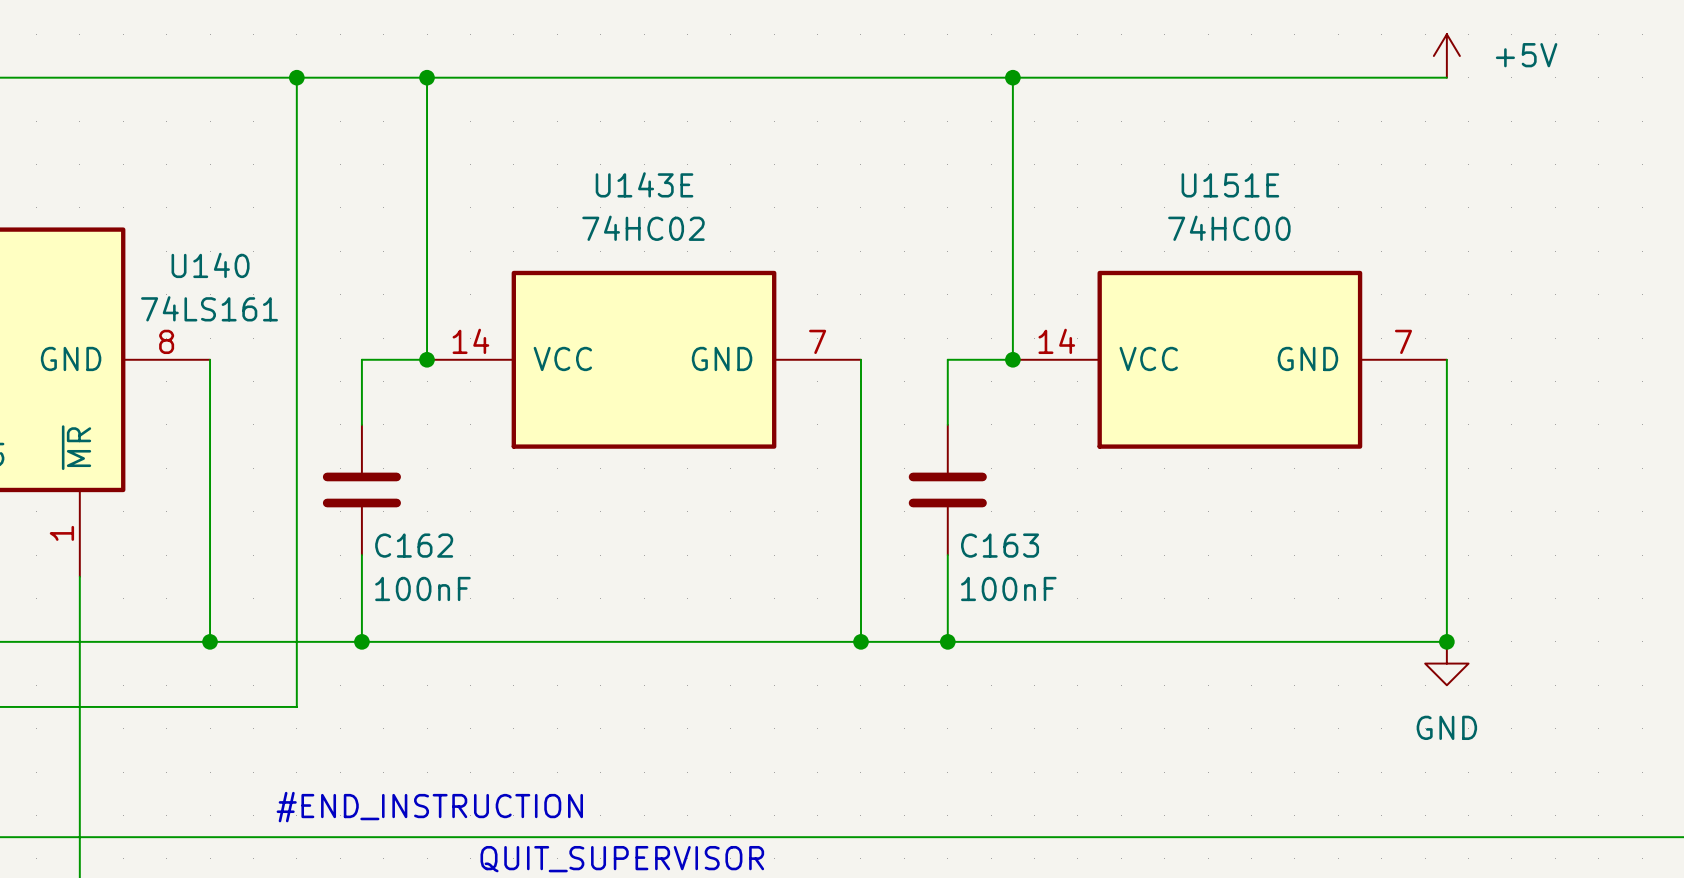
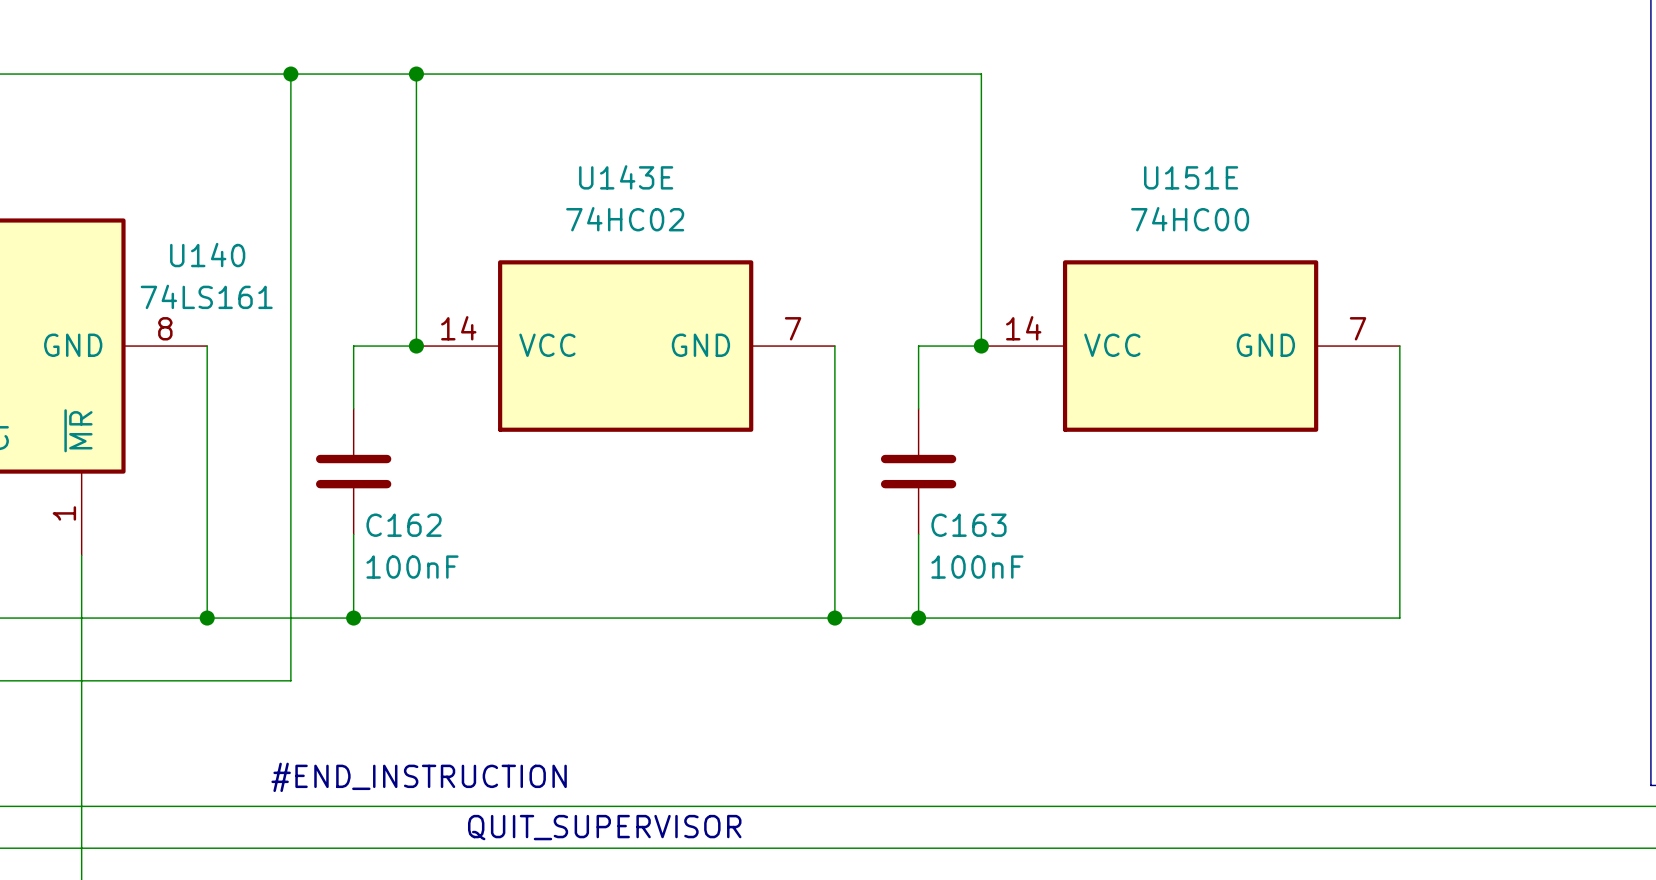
power symbol: +5V (1446, 56) -> none
wire: (1012, 77) (1446, 77) -> none
junction: (1012, 77) -> none
junction: (1446, 641) -> none
power symbol: GND (1446, 663) -> none

